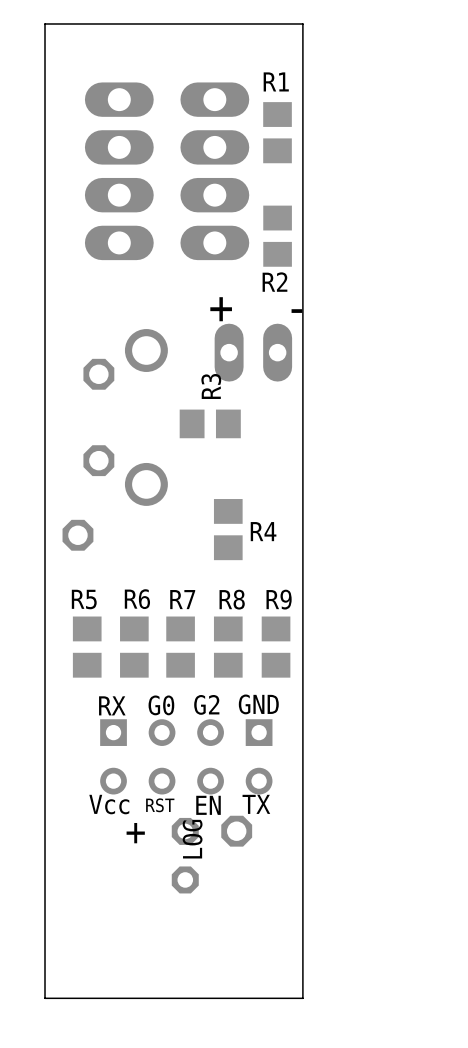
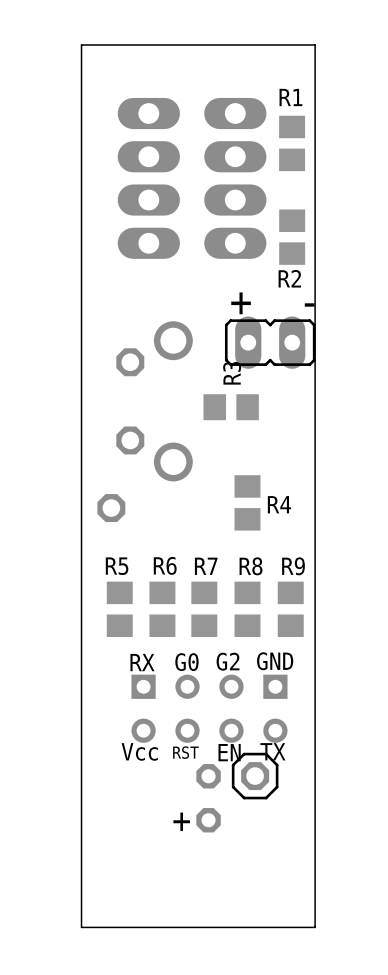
part side: bottom (253, 352) -> top (270, 342)
LOG side: bottom (236, 831) -> top (255, 776)
text position: + (135, 833) -> + (181, 821)

